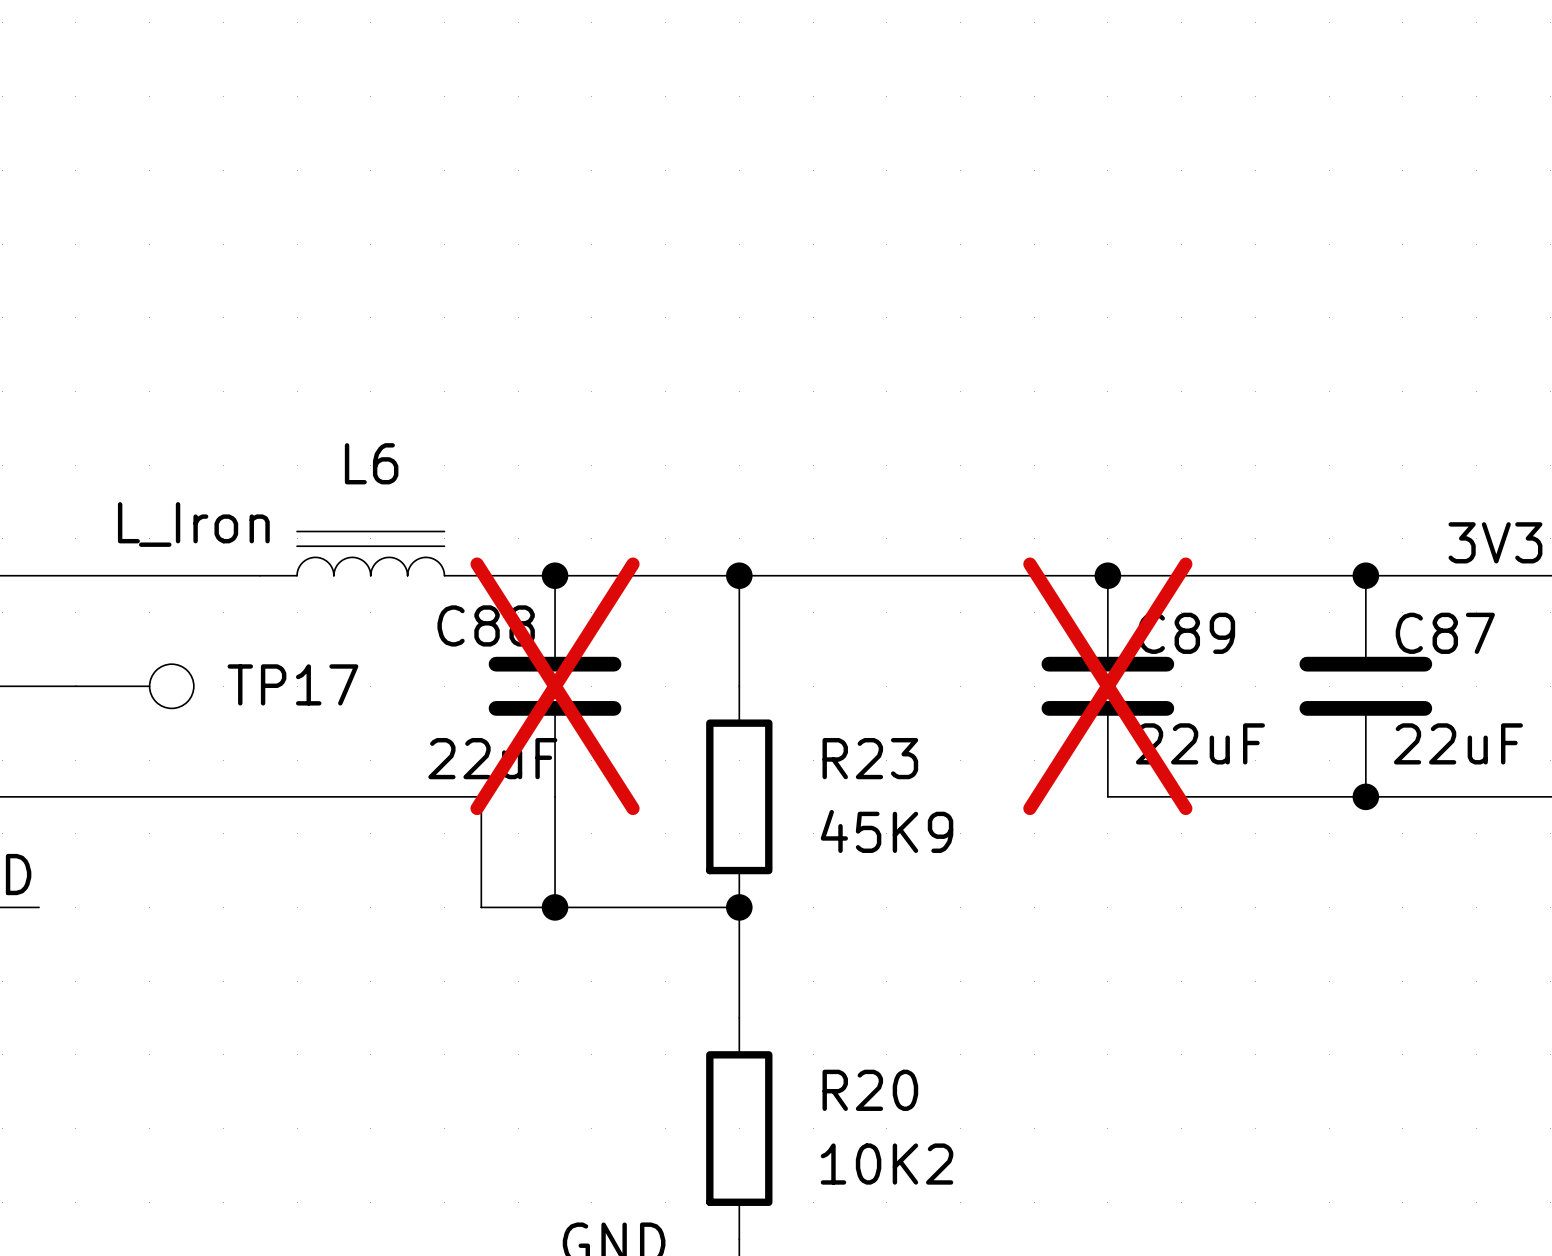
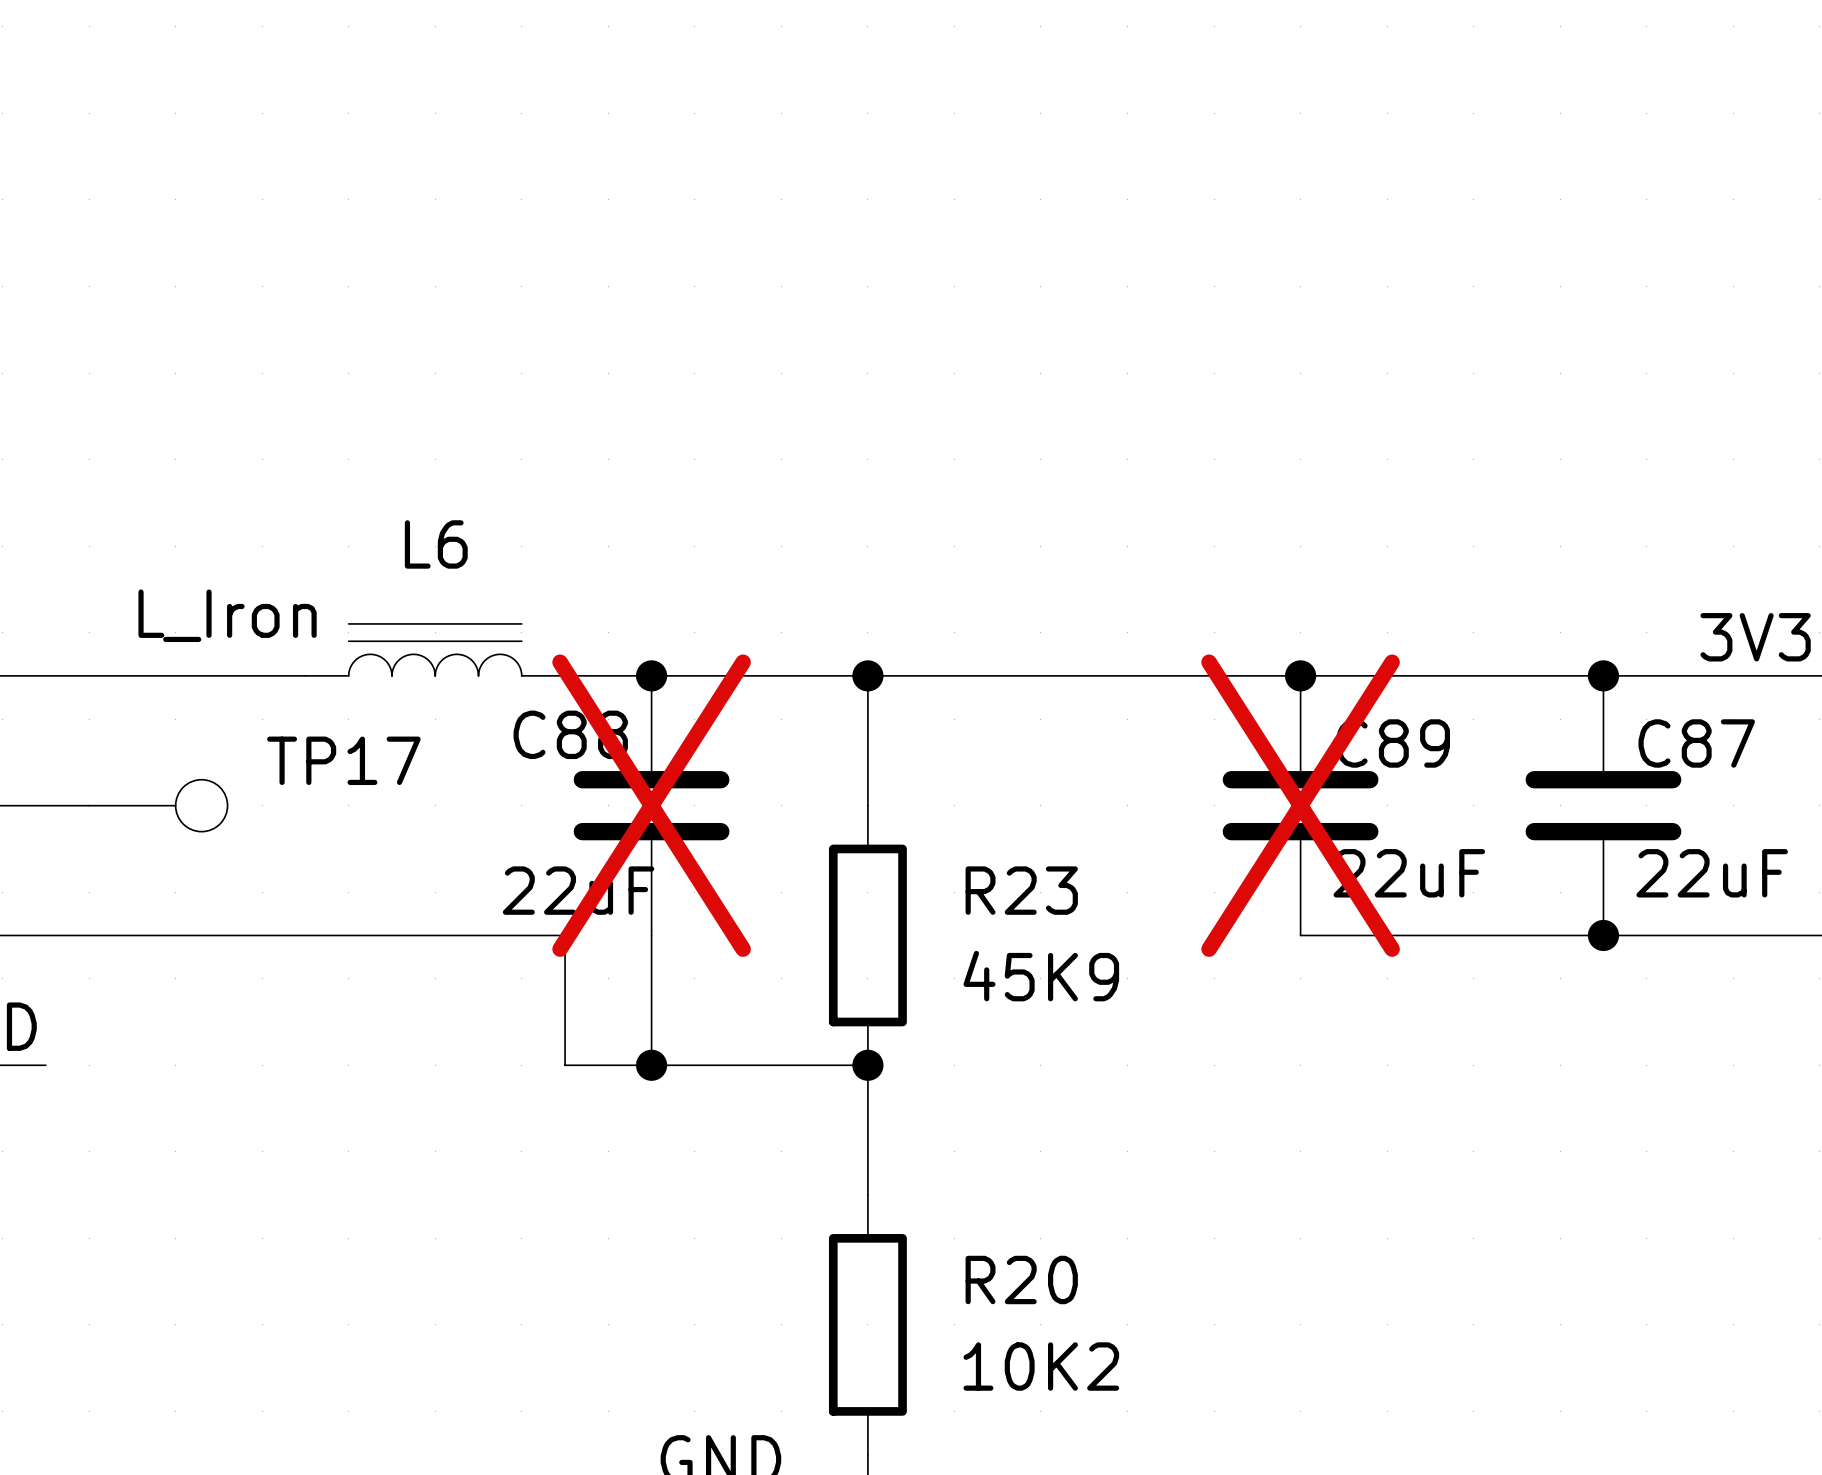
TP17 name position: TP17 (292, 684) -> TP17 (343, 760)

